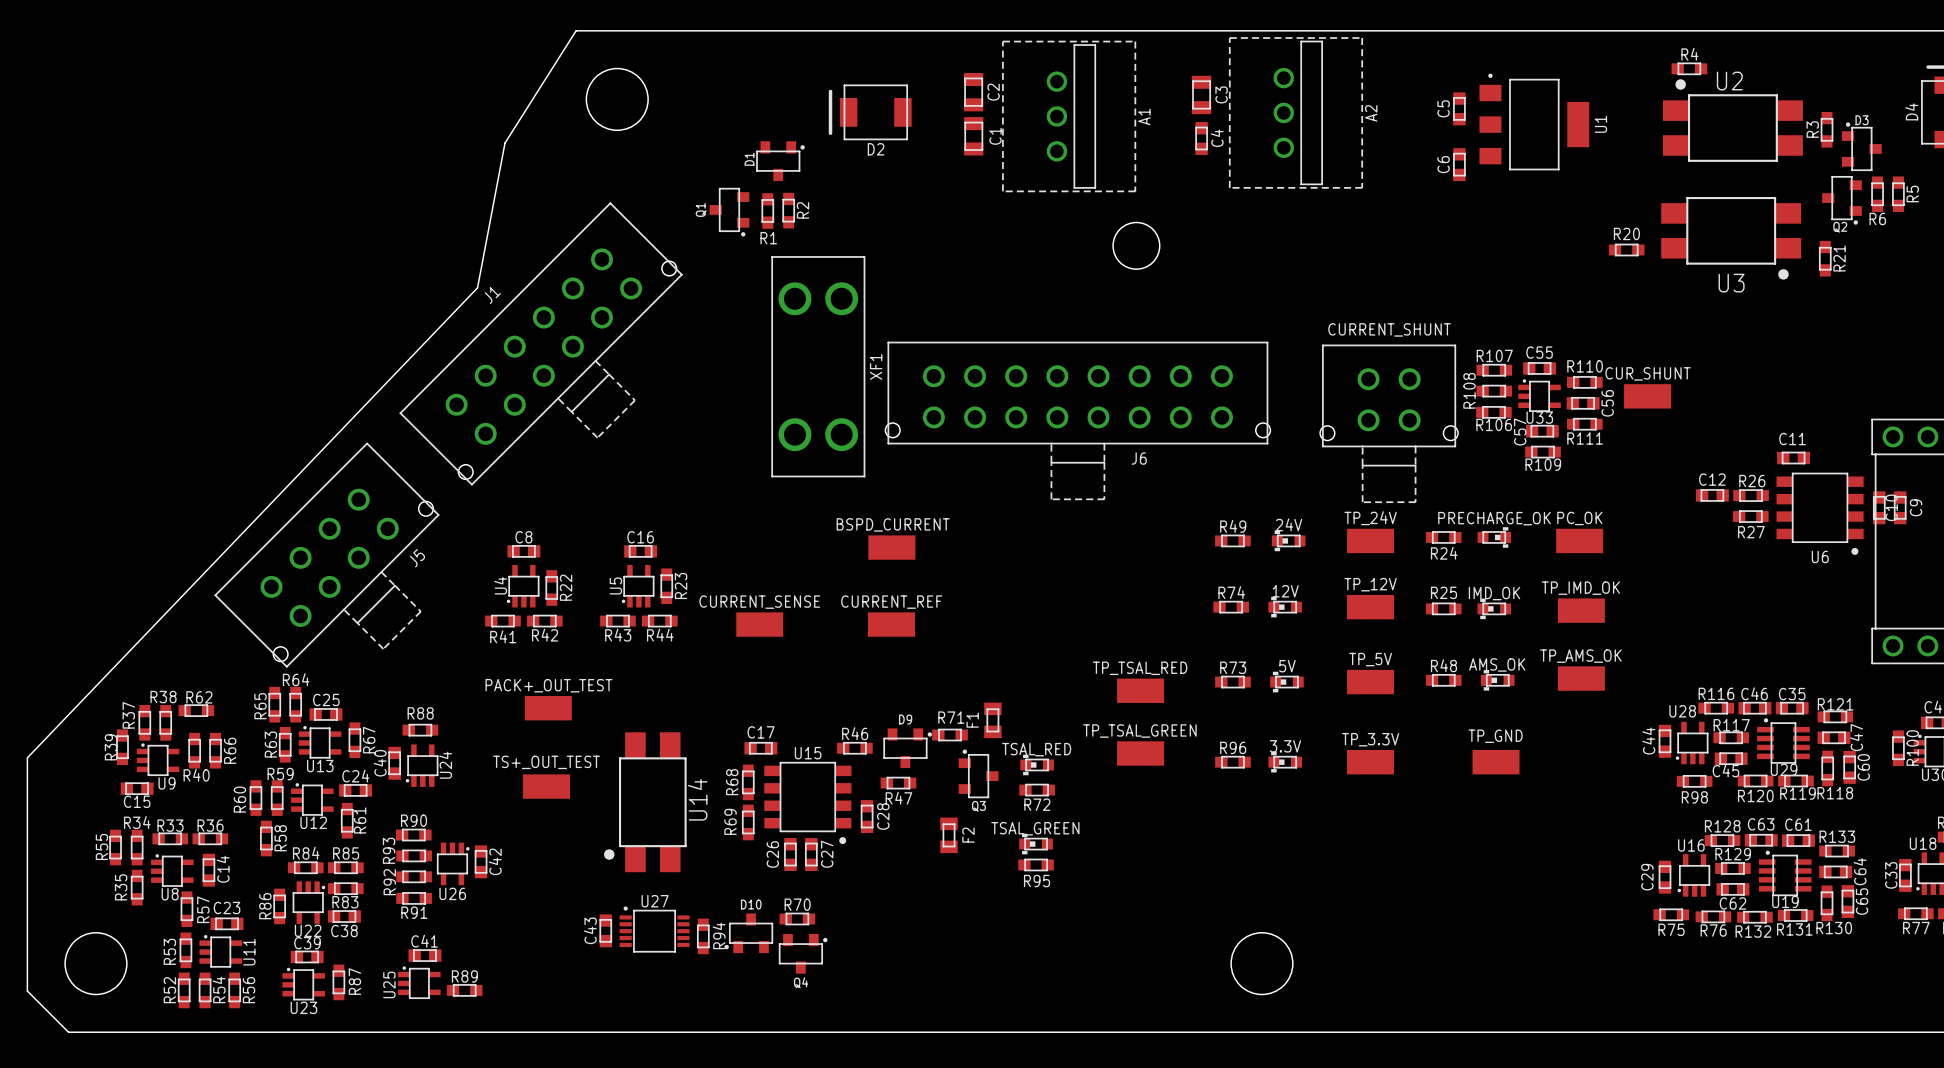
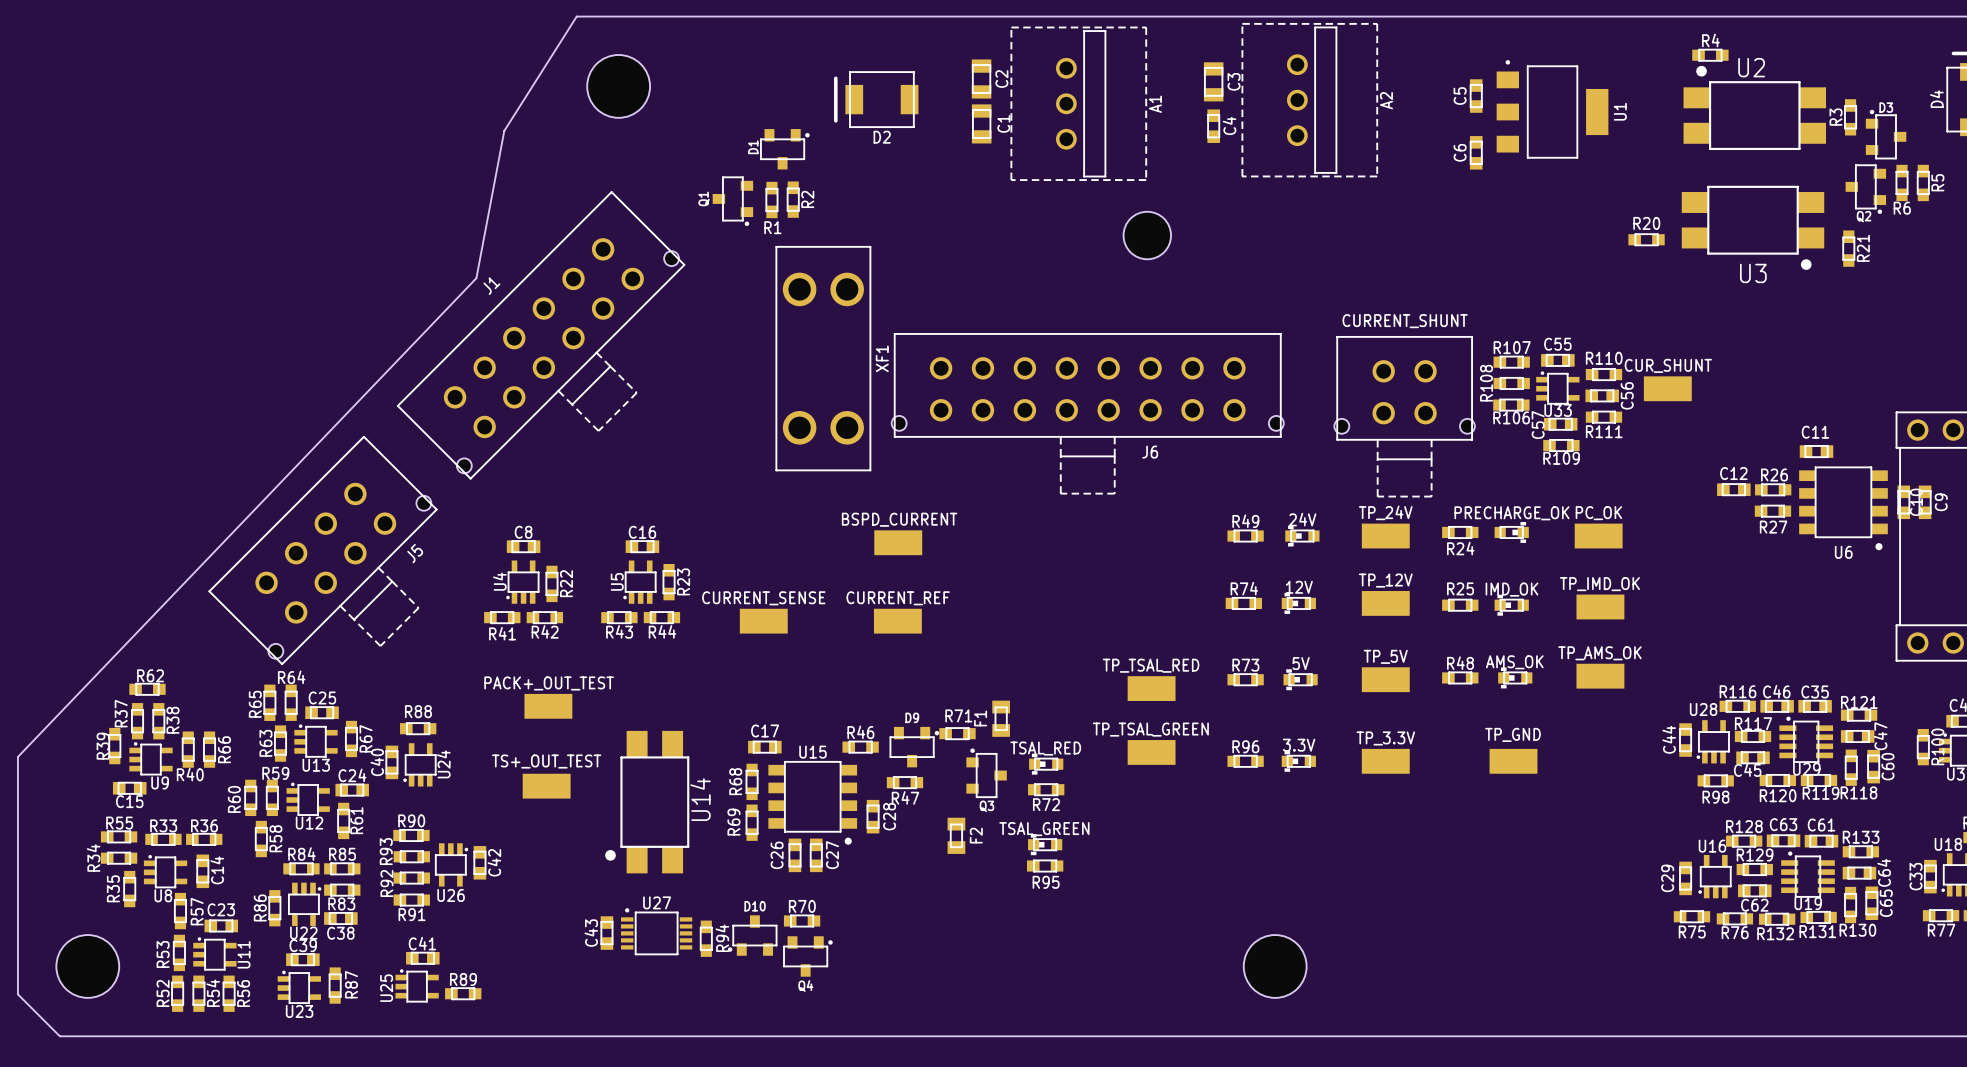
R38 name rotation: 0° (163, 697) -> 90° counterclockwise (173, 720)
R62 position: (196, 710) -> (147, 689)
R34 name position: R34 (137, 822) -> R34 (93, 858)
R55 rotation: 0° (115, 847) -> 90° clockwise (119, 836)
R34 rotation: 0° (137, 847) -> 90° clockwise (119, 858)

